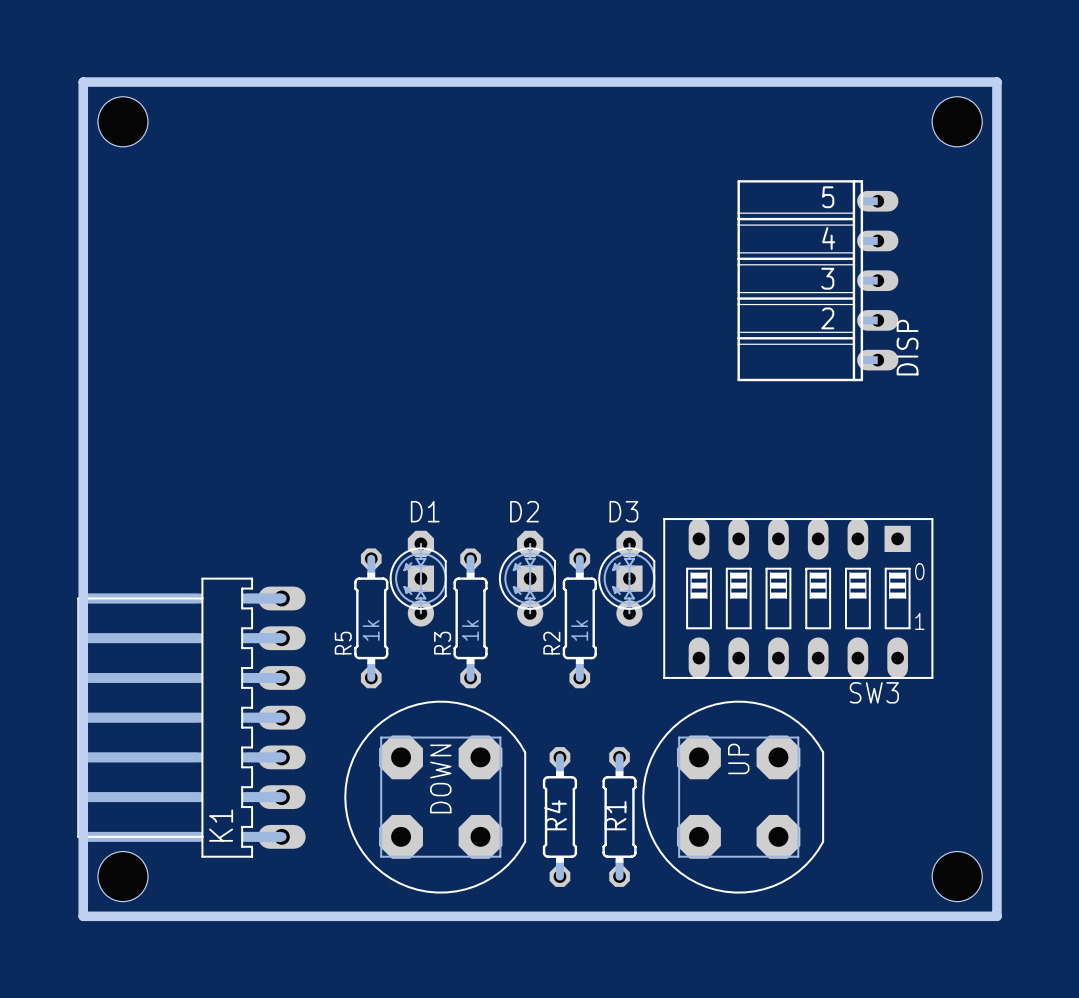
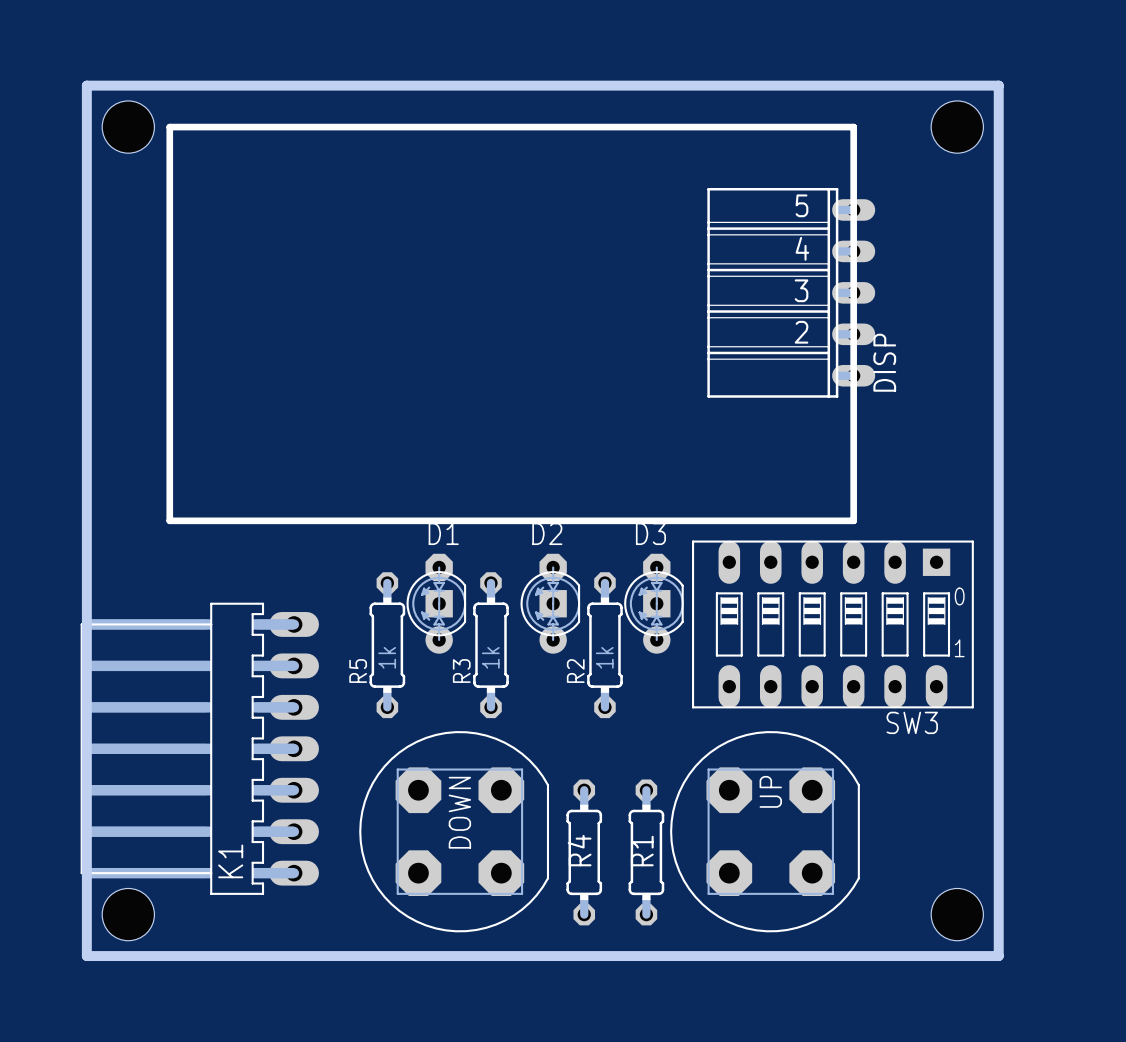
board edge: (957, 82) (996, 82) (996, 916) (957, 916) -> (998, 85) (998, 956)
line: none -> (169, 127) (169, 520) (853, 520) (853, 127) (169, 127)
hole position: (957, 121) -> (957, 127)
DISP position: (817, 280) -> (791, 292)
hole position: (957, 876) -> (957, 914)

